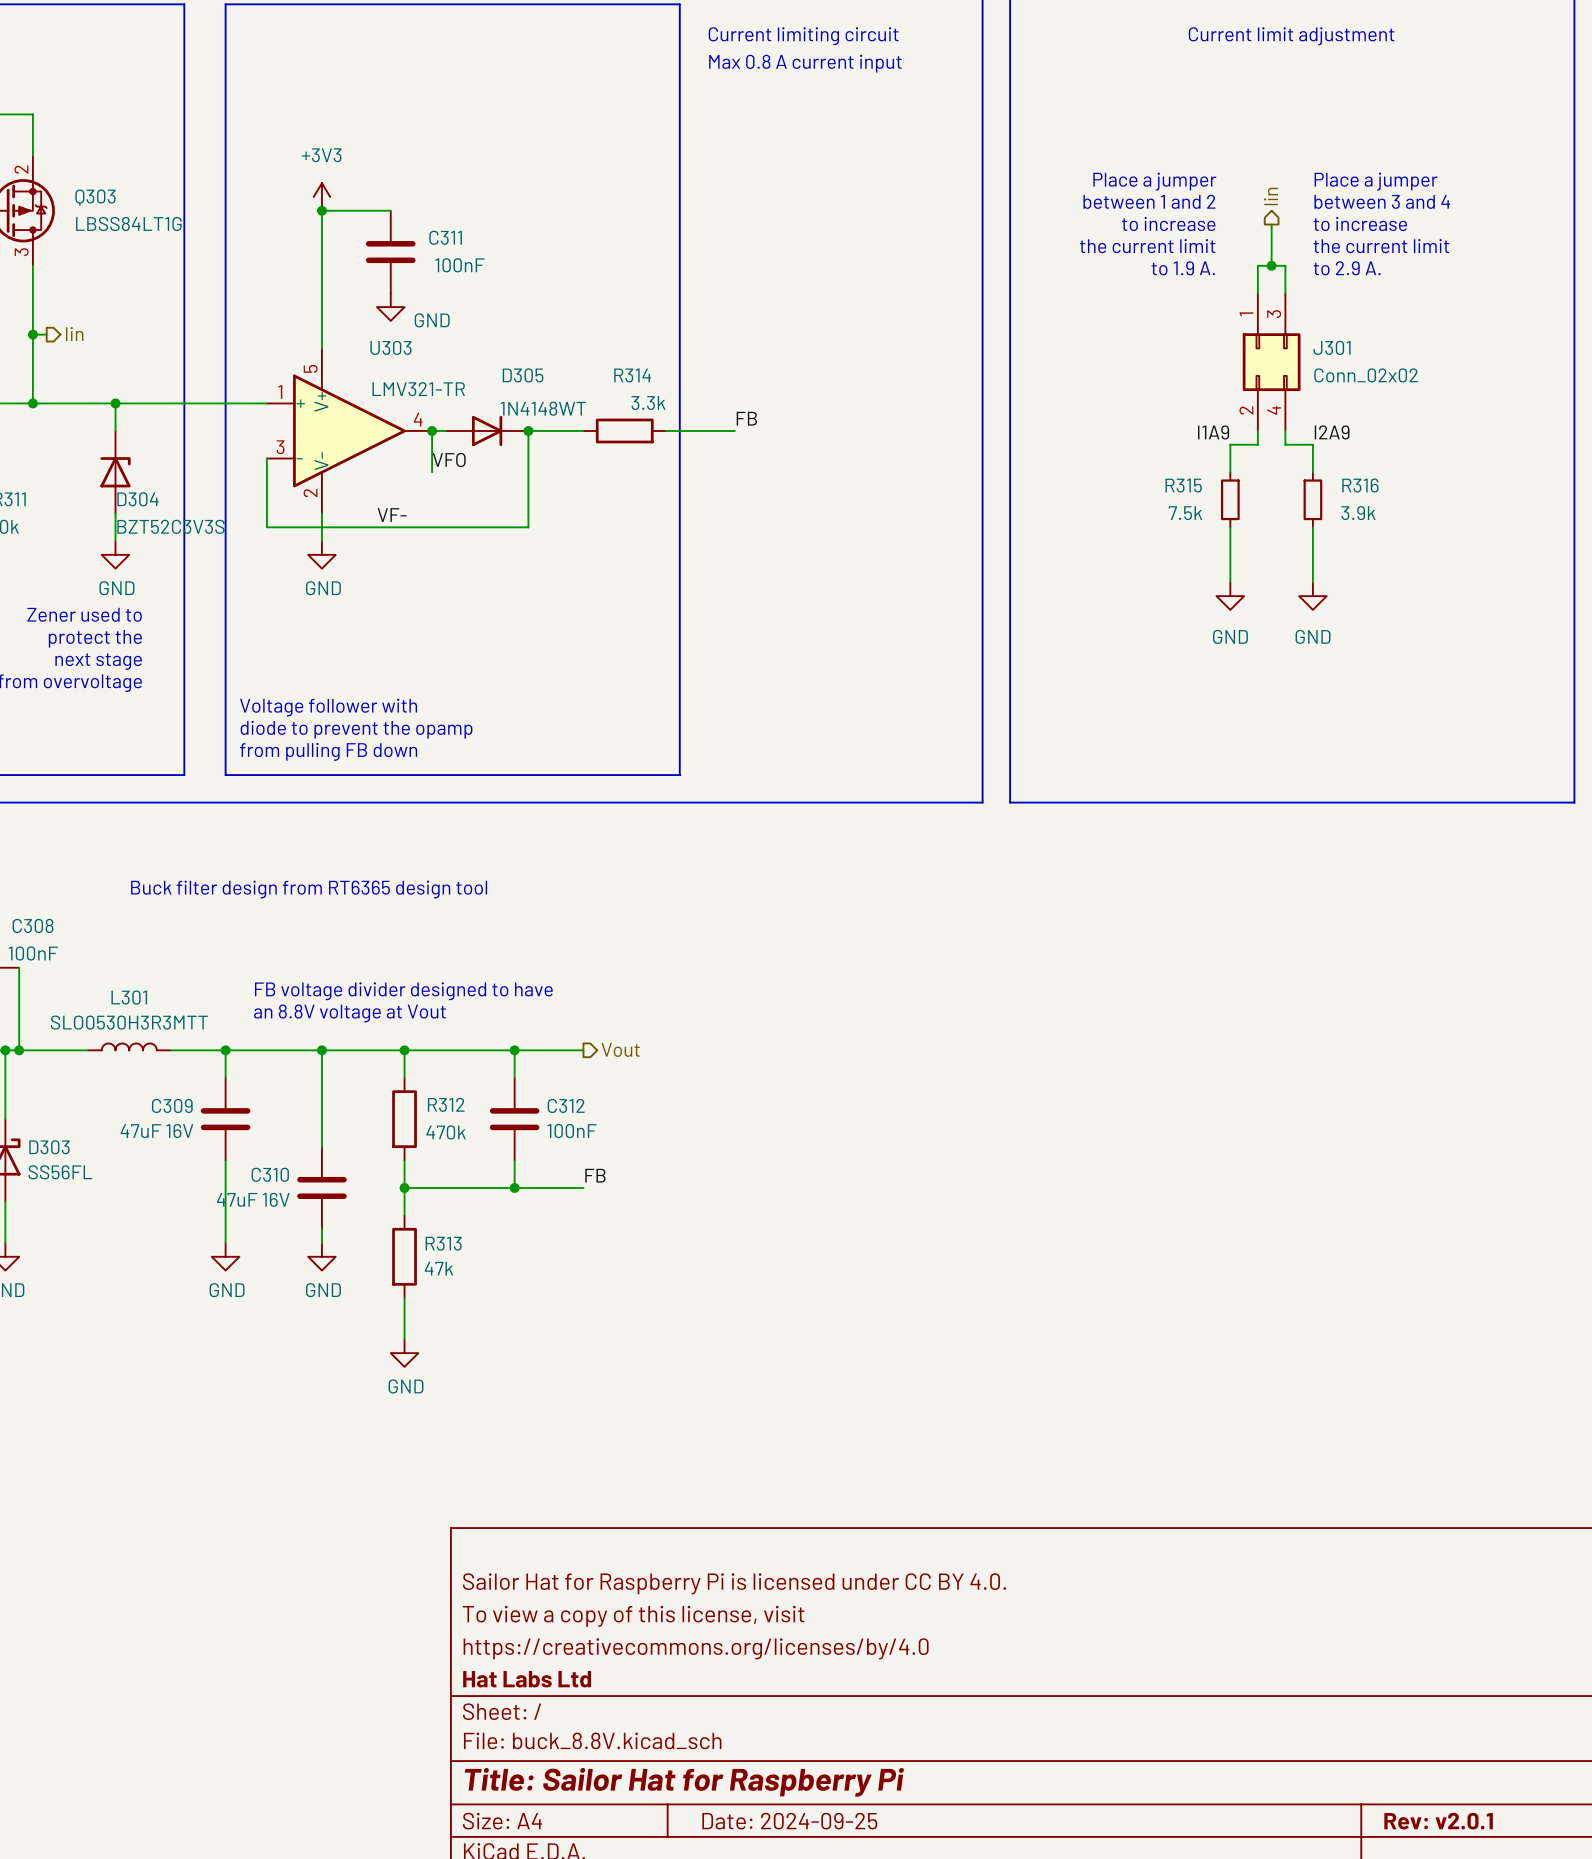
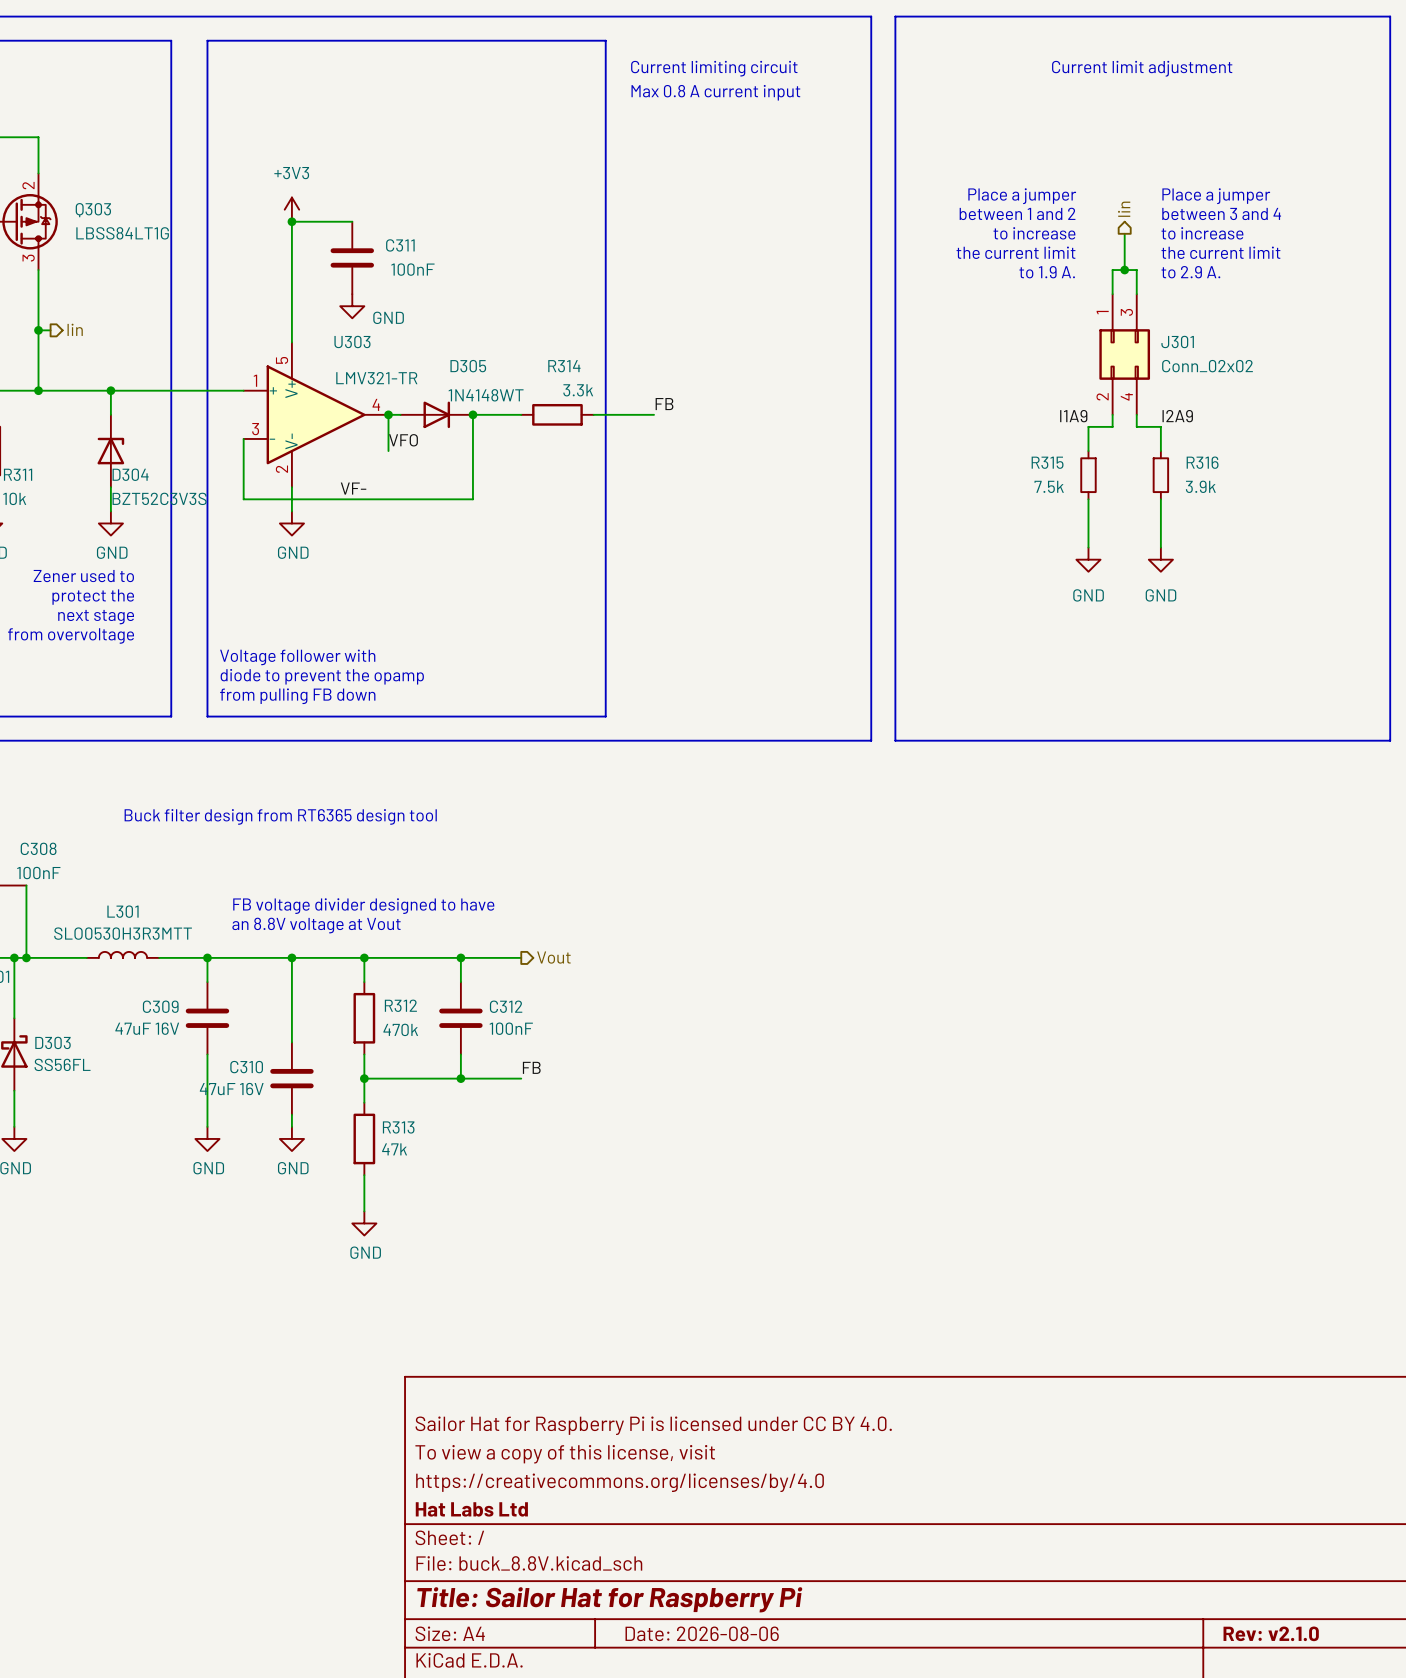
title block: Date: 2024-09-25 (789, 1821) -> Date: 2026-08-06 (702, 1633)
title block: Rev: v2.0.1 (1438, 1821) -> Rev: v2.1.0 (1271, 1633)

